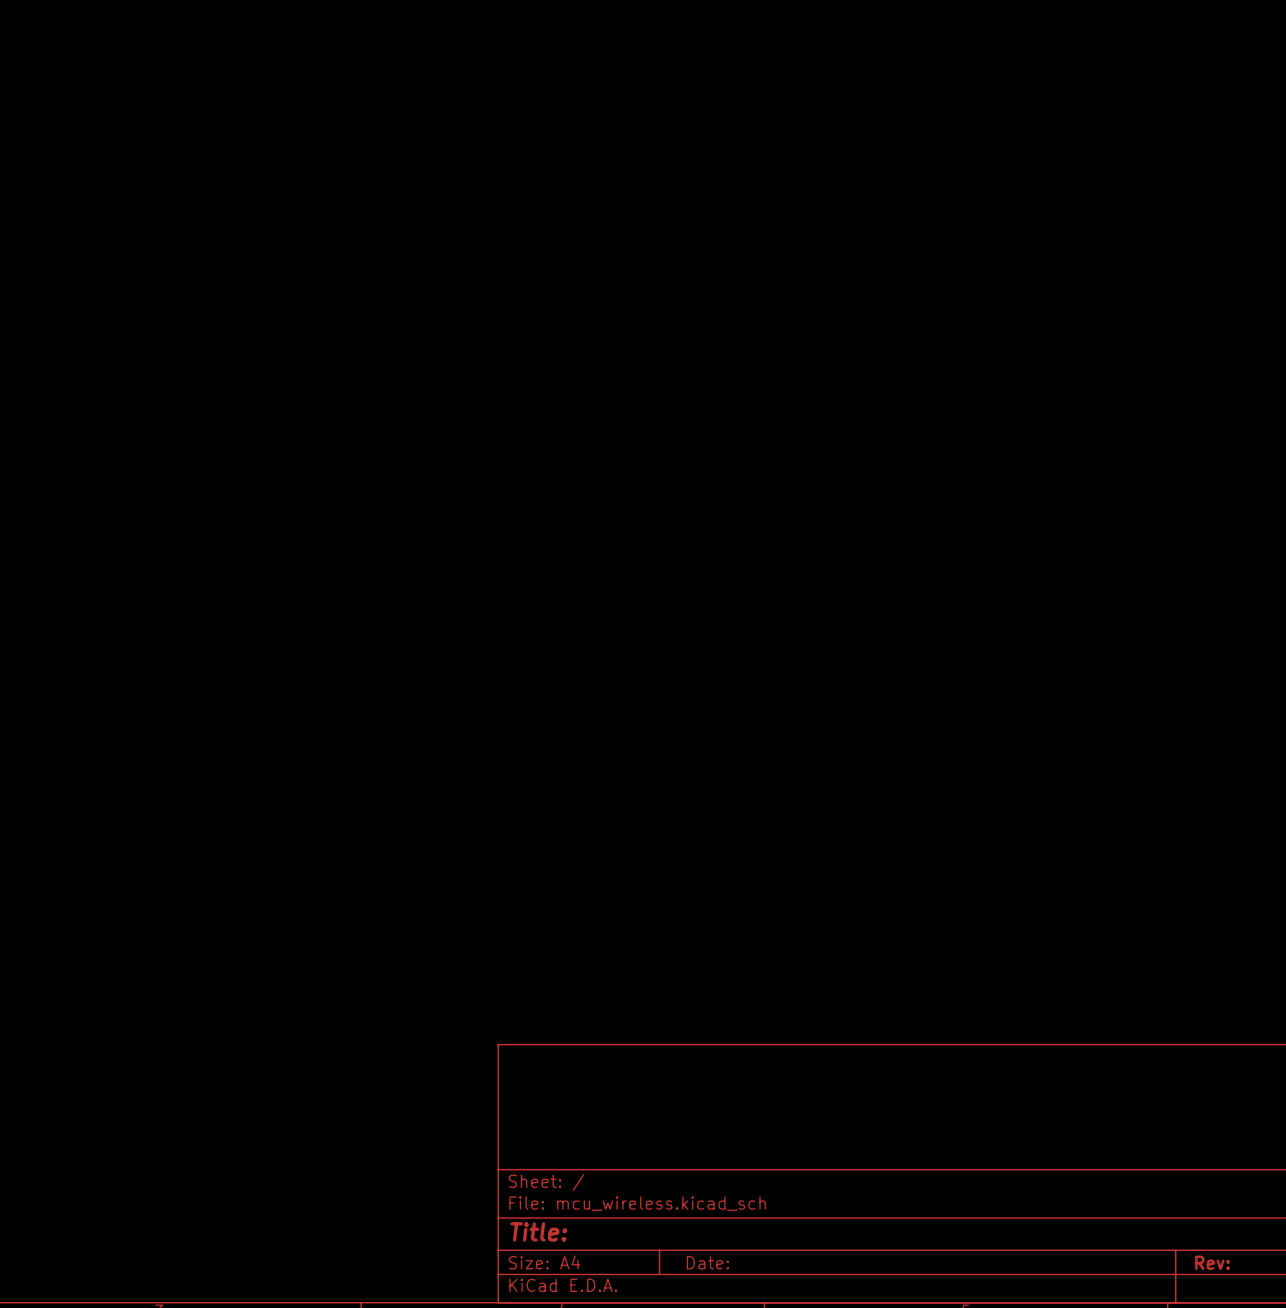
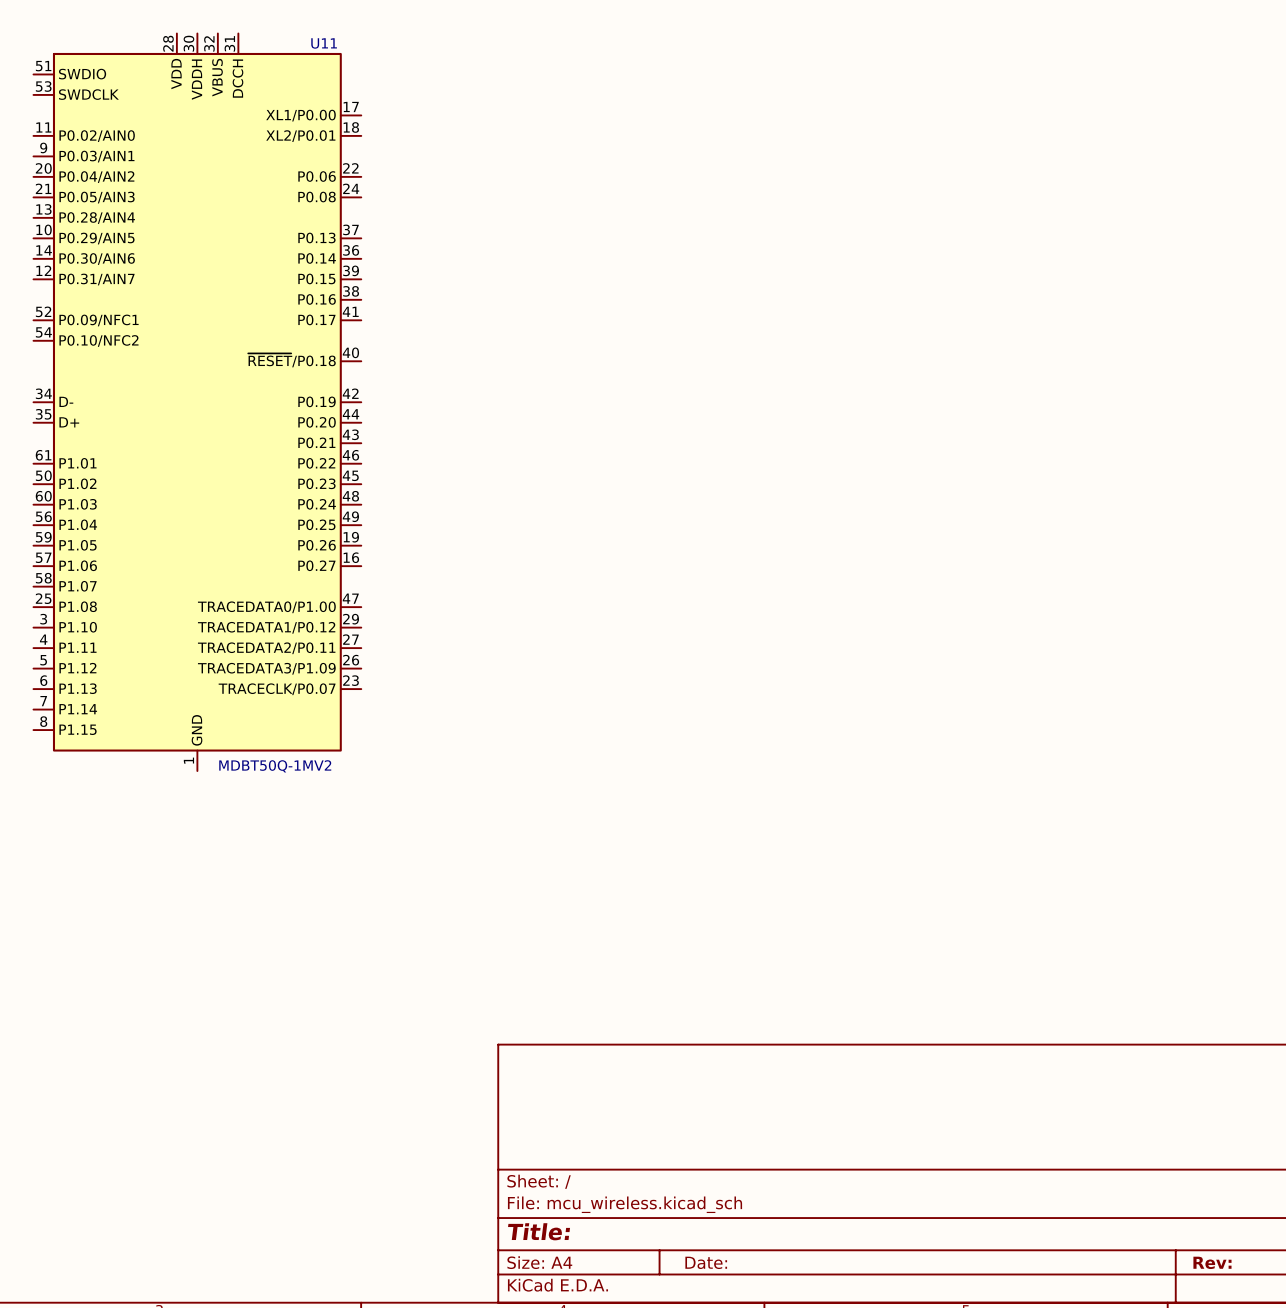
U11: none -> MDBT50Q-1MV2 (197, 402)

